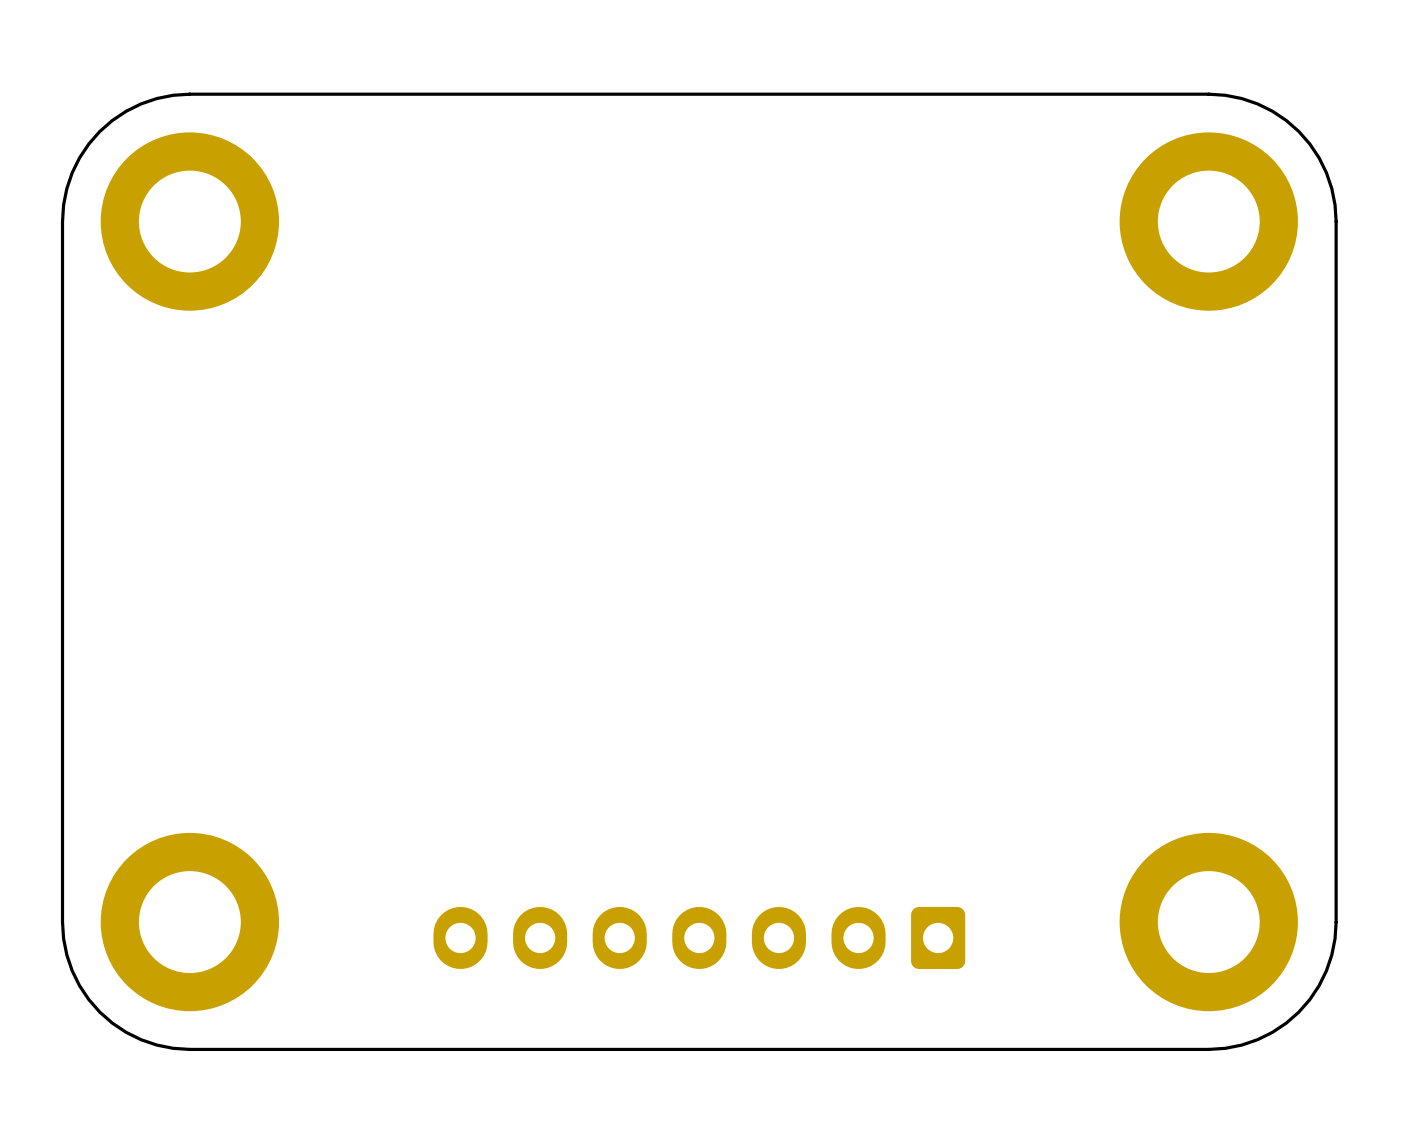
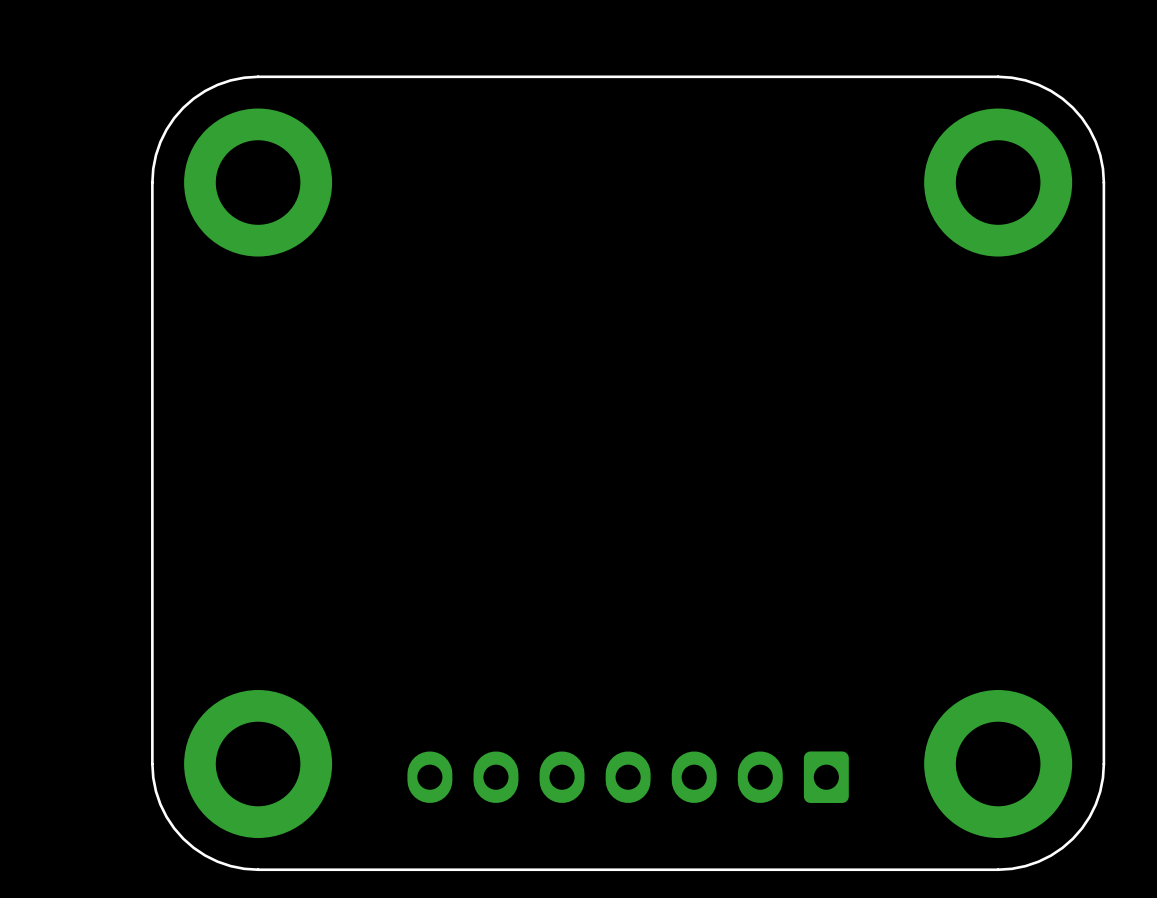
board edge: (317, 94) (173, 95) (156, 98) (126, 111) (99, 131) (79, 157) (66, 188) (62, 221) (62, 922) (66, 955) (72, 970) (88, 999) (112, 1023) (141, 1039) (156, 1045) (189, 1049) (317, 1049) -> (258, 76) (244, 77) (217, 84) (193, 98) (183, 107) (174, 118) (160, 142) (155, 155) (152, 182) (153, 777) (155, 791) (166, 816) (183, 838) (205, 855) (217, 861) (244, 868) (258, 869)
part position: (189, 221) -> (258, 182)
part position: (189, 922) -> (258, 764)
part position: (699, 937) -> (628, 777)

